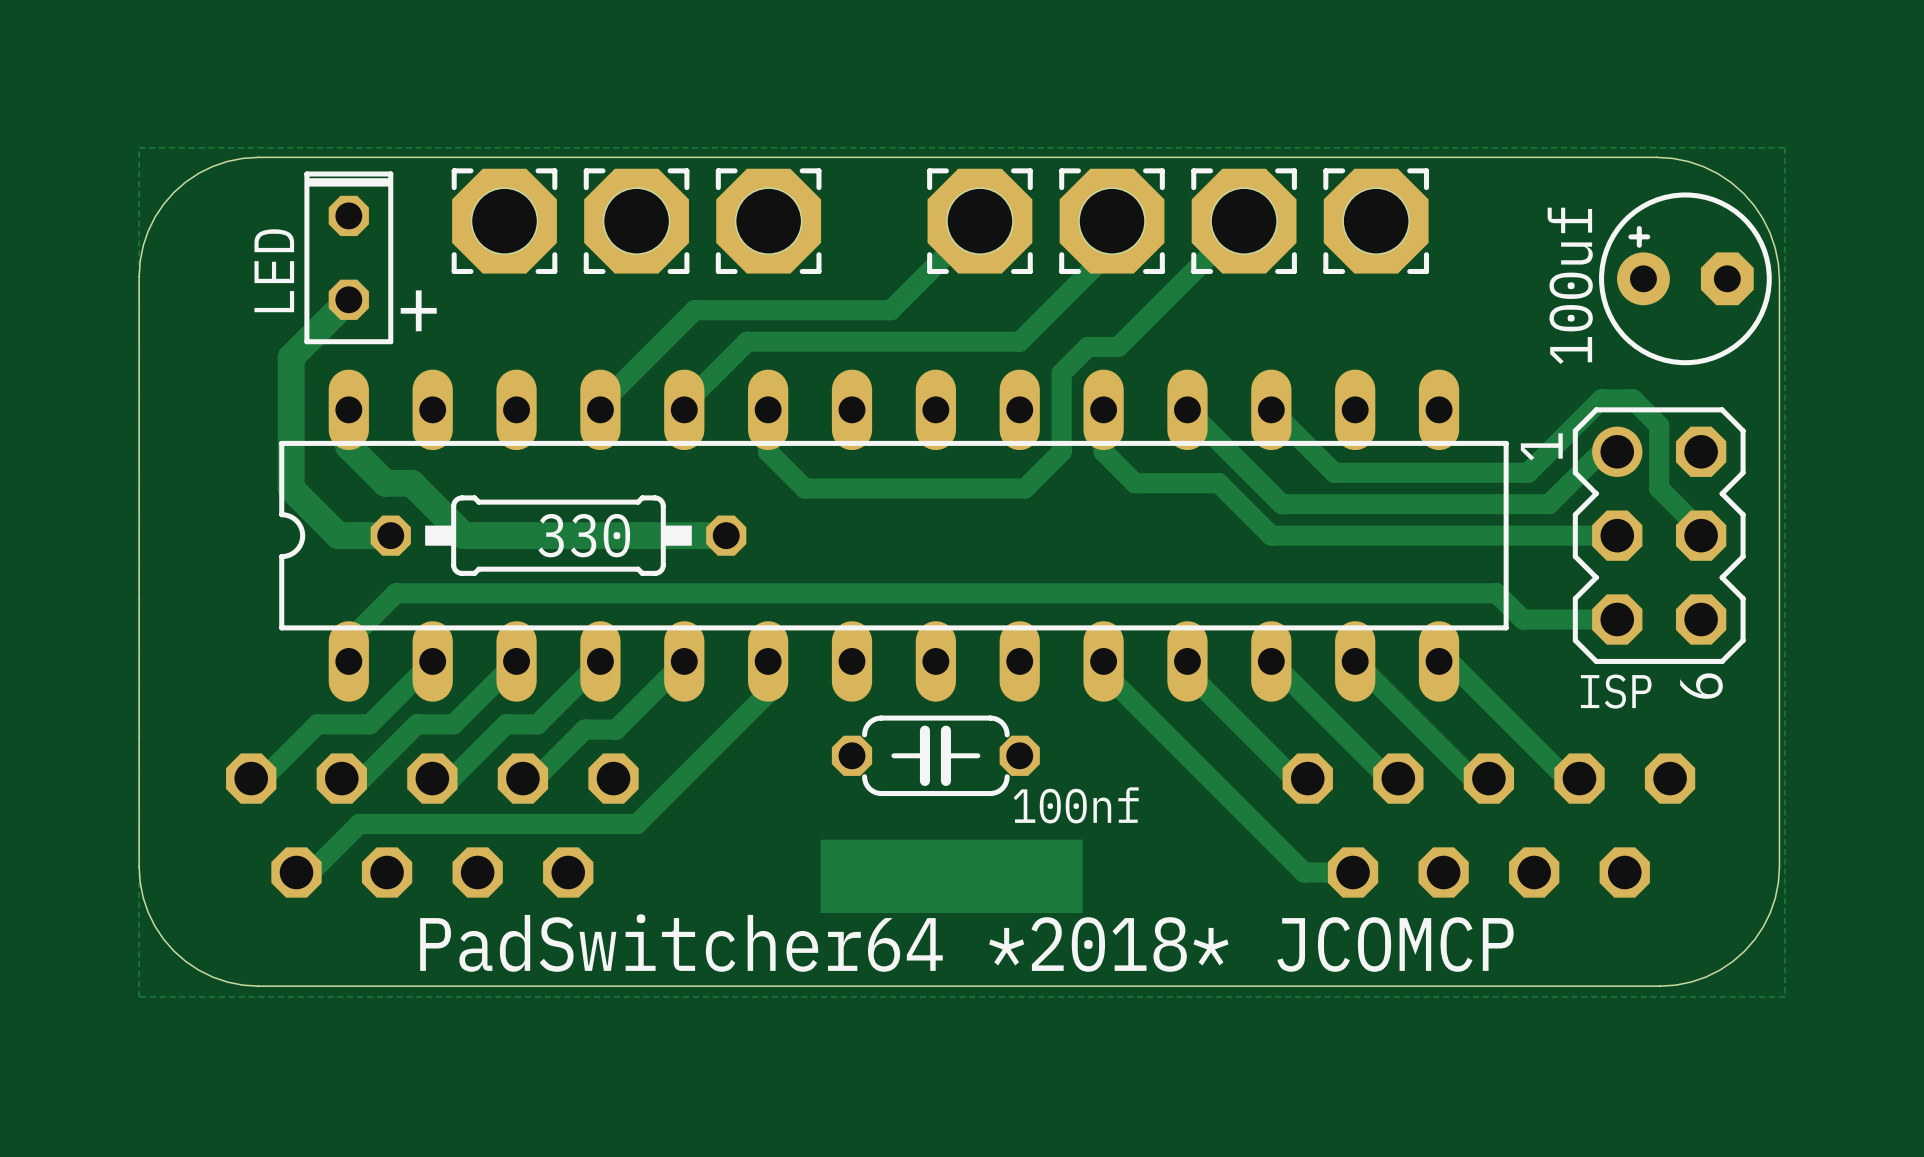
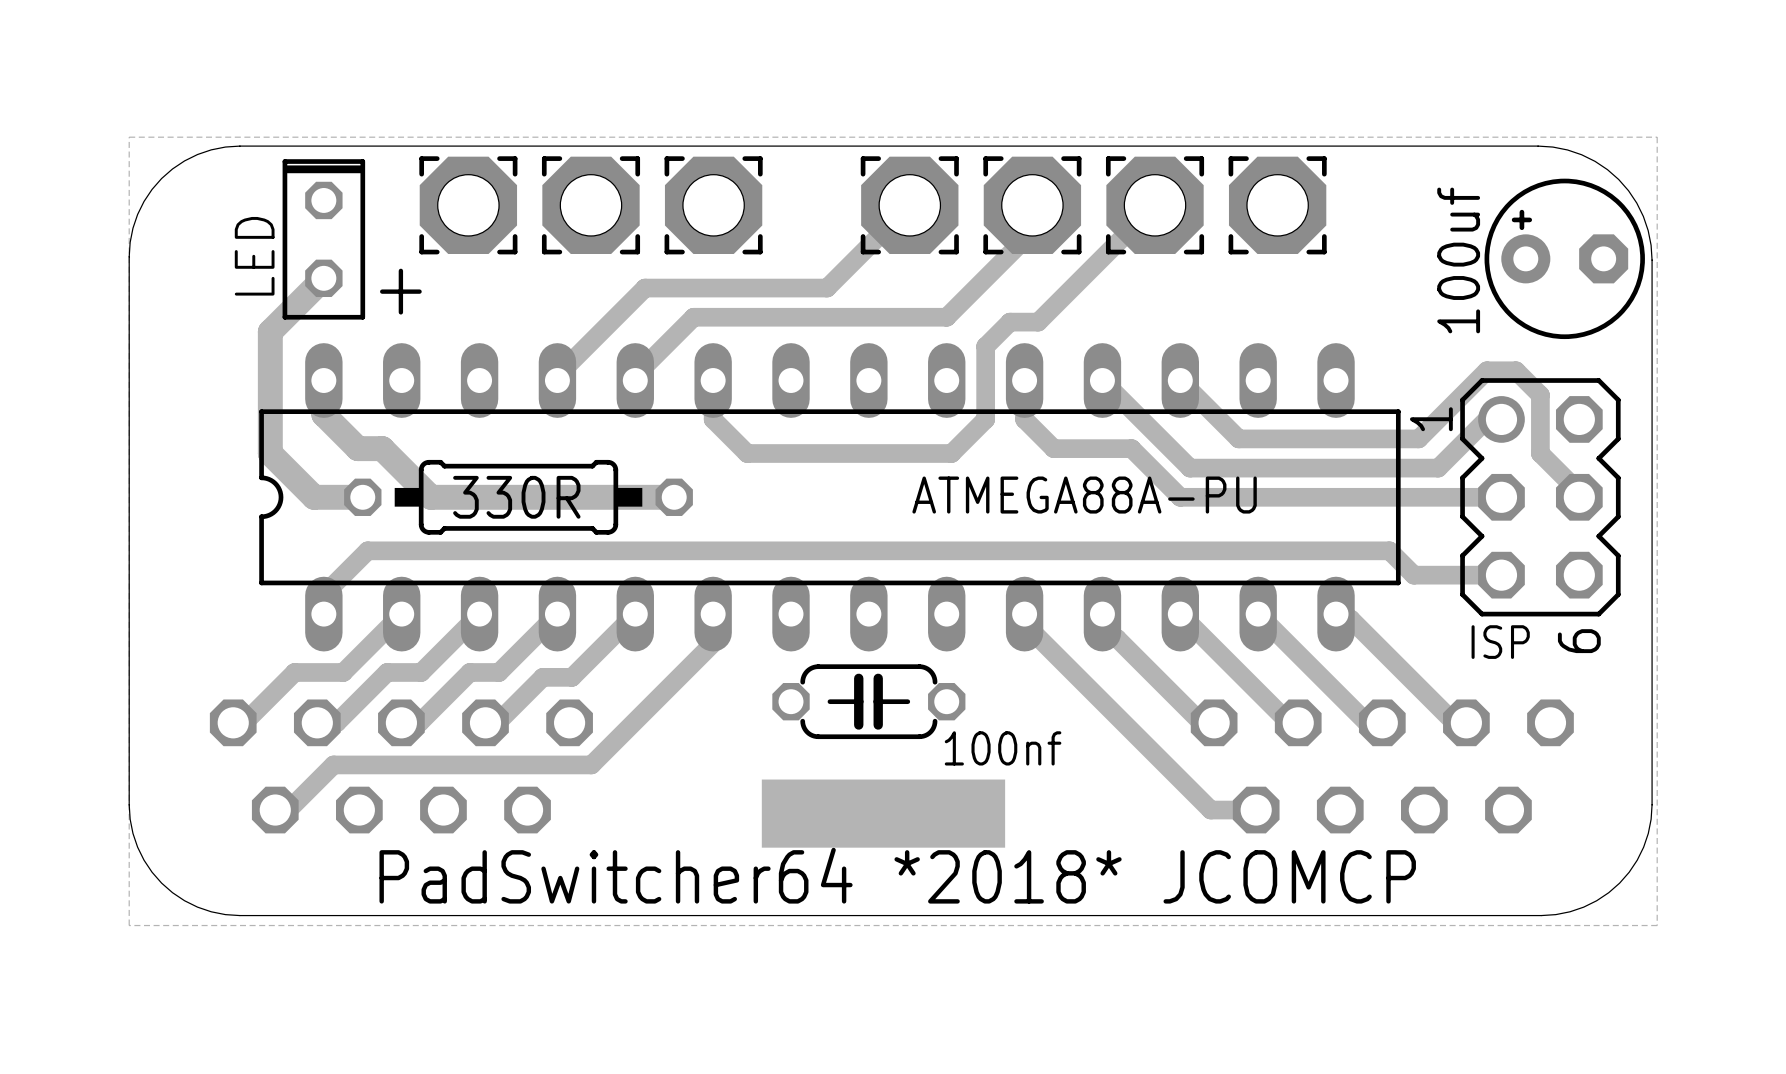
part value: none -> ATMEGA88A-PU (1084, 495)
part value: 330 (584, 535) -> 330R (516, 497)

